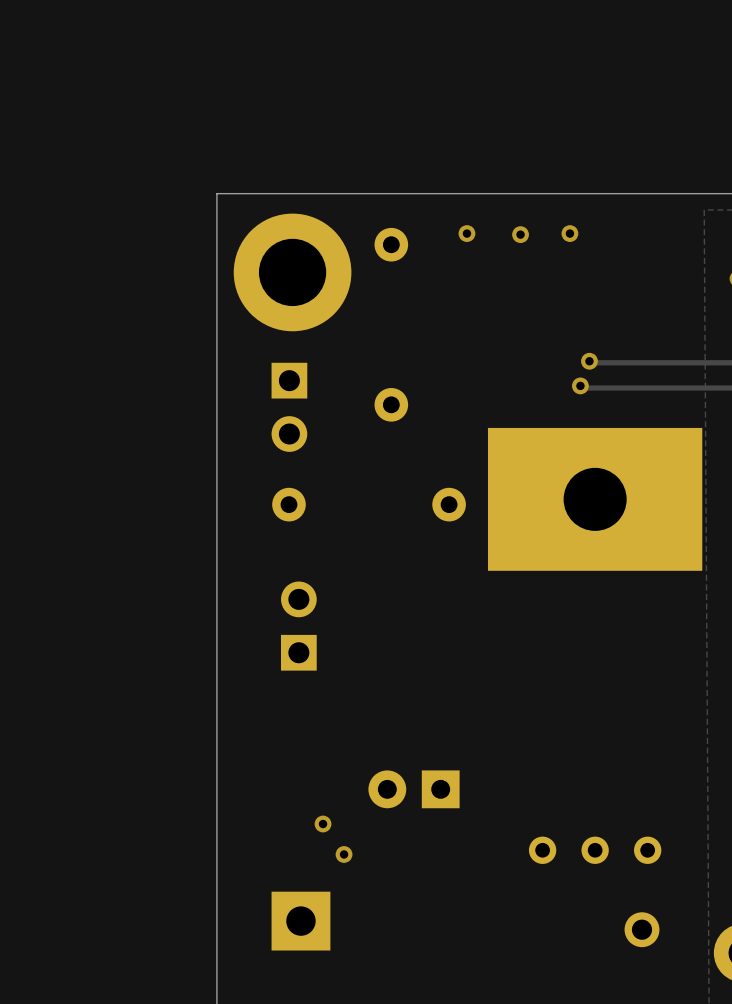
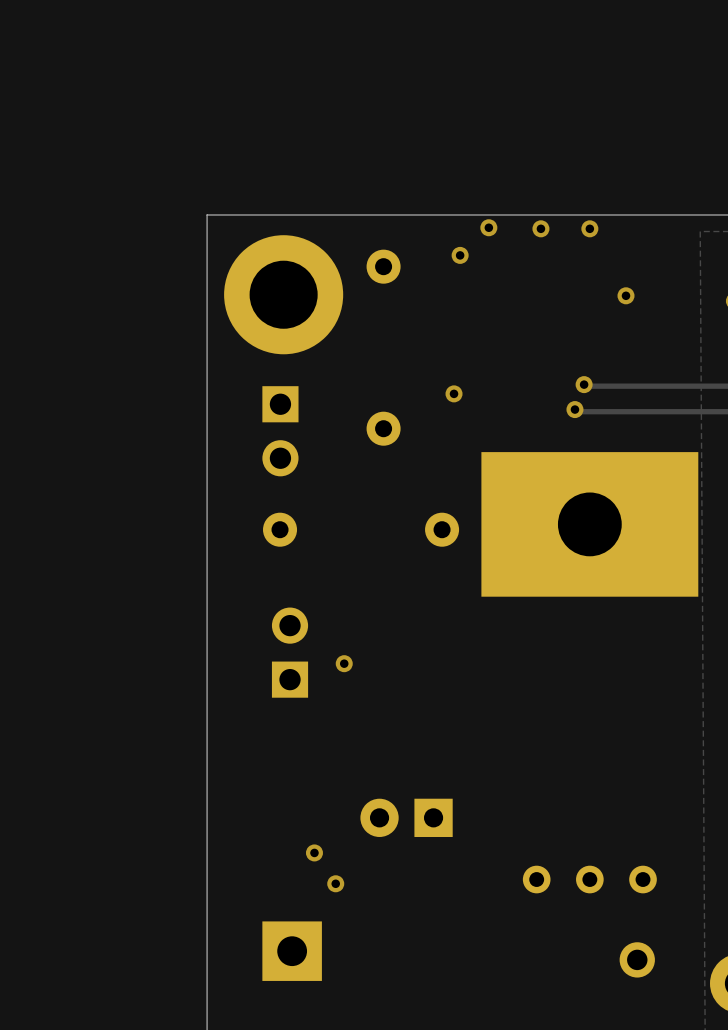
via: none -> (488, 227)
via: none -> (540, 228)
via: none -> (589, 228)
via: (569, 233) -> none
via: (520, 234) -> none
via: none -> (626, 295)
via: none -> (454, 393)
via: none -> (344, 663)

